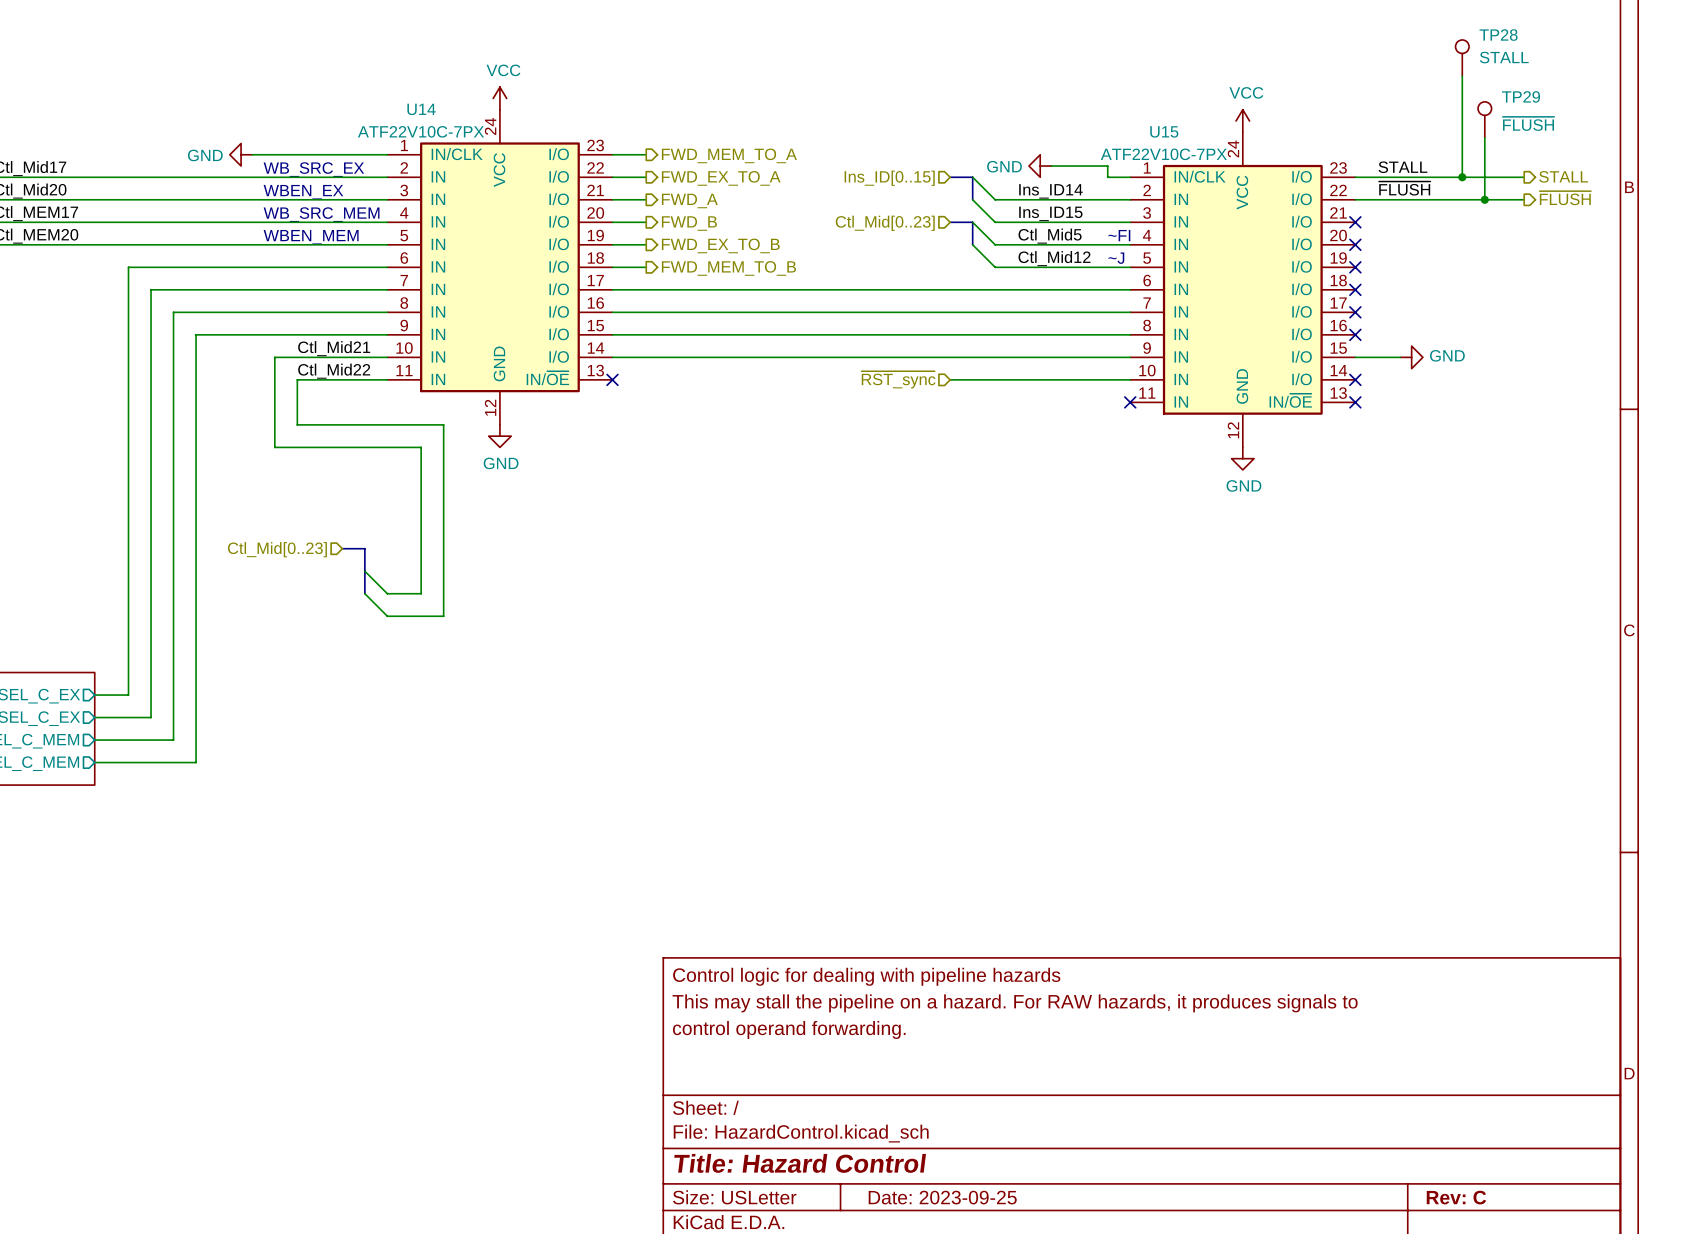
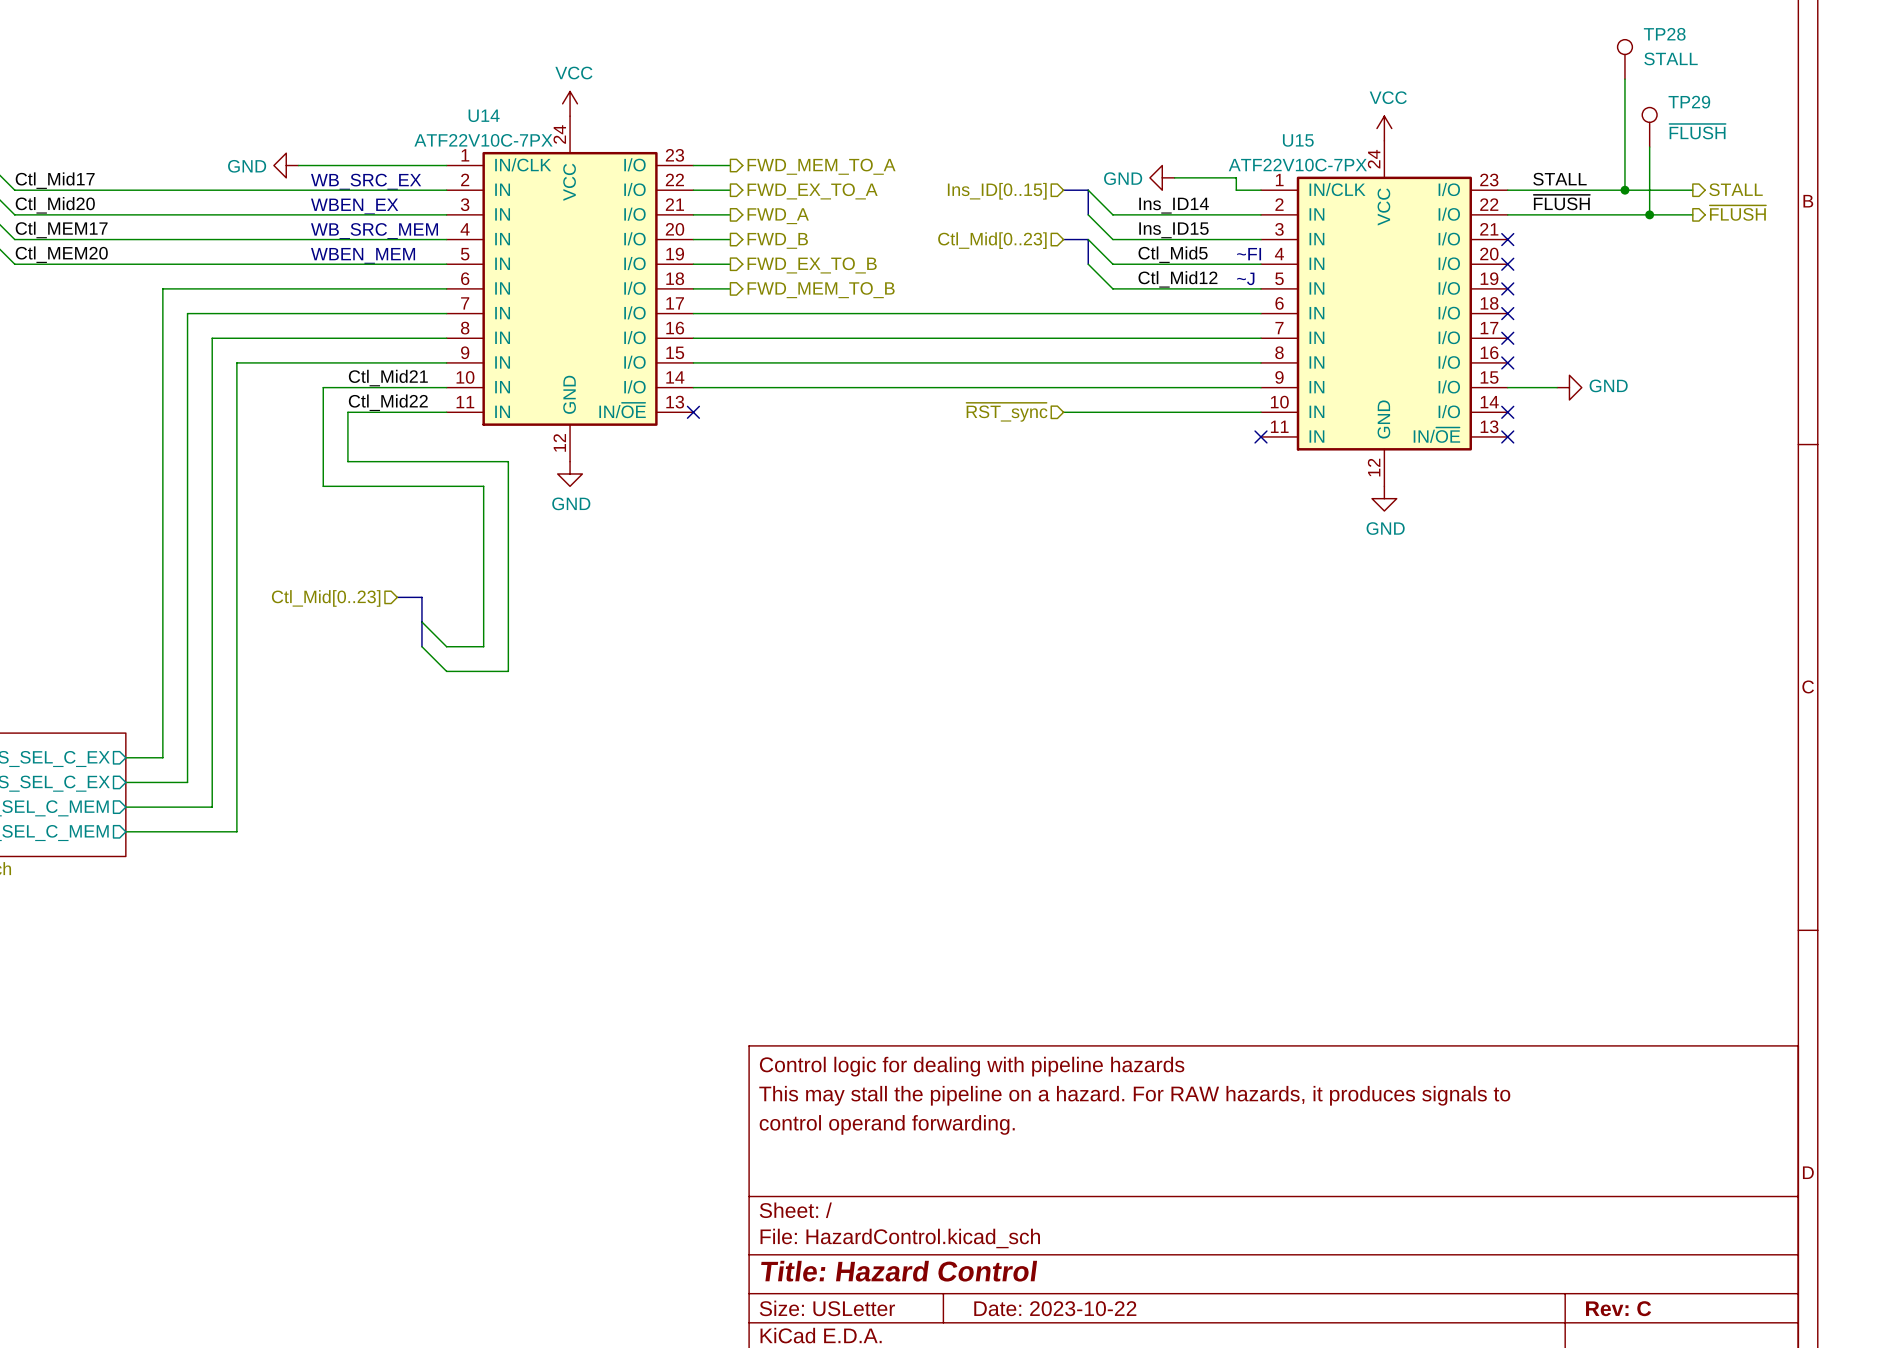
title block: Date: 2023-09-25 (942, 1197) -> Date: 2023-10-22 (1055, 1308)

